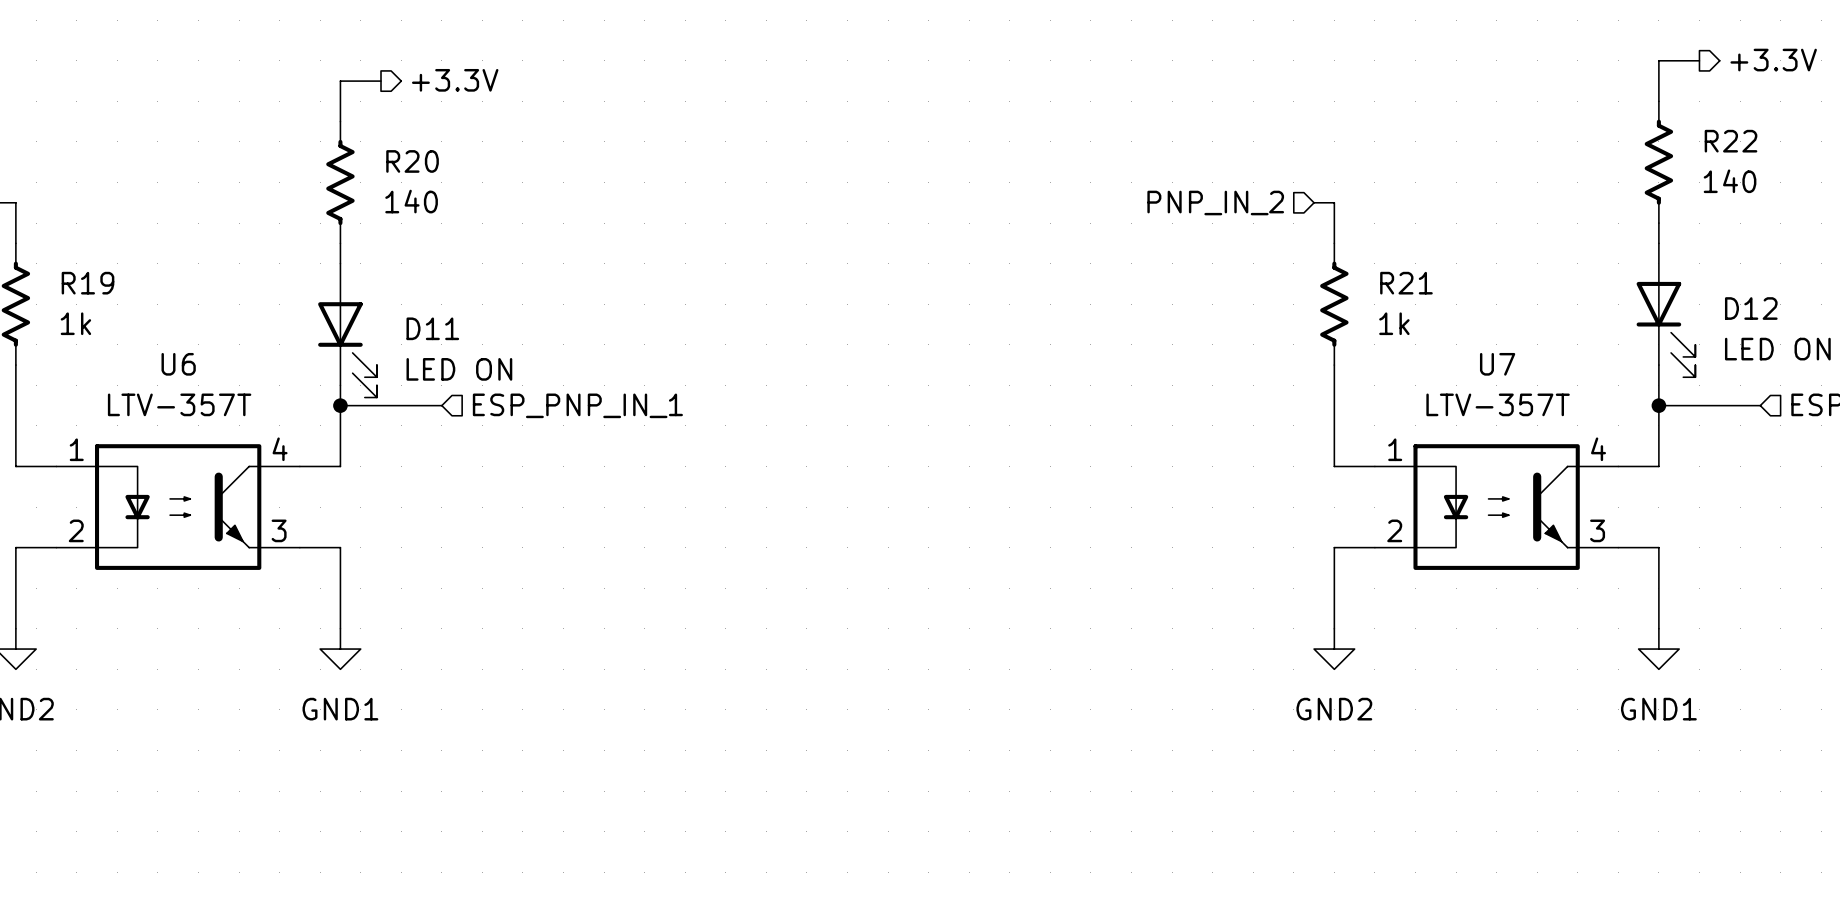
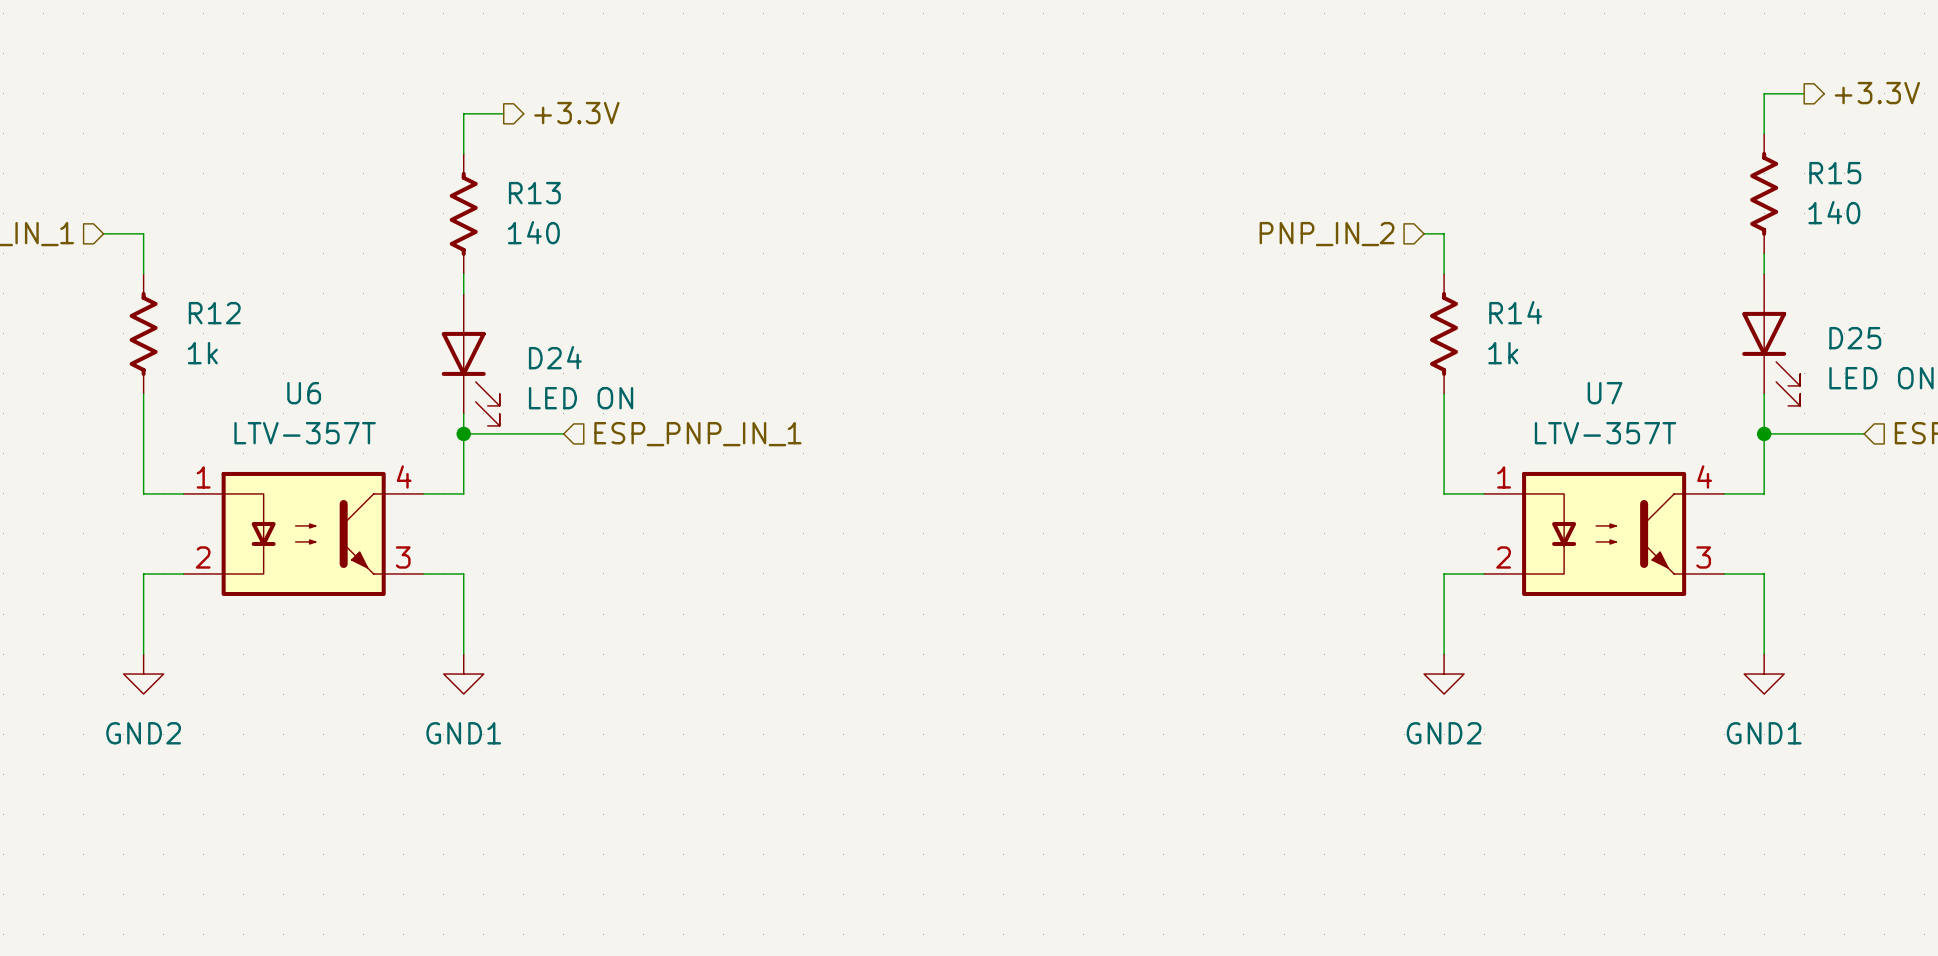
R22 name: R22 (1731, 141) -> R15 (1835, 173)
R20 name: R20 (412, 161) -> R13 (534, 193)
R19 name: R19 (88, 283) -> R12 (214, 313)
R21 name: R21 (1406, 283) -> R14 (1515, 312)
D12 name: D12 (1751, 308) -> D25 (1855, 338)
D11 name: D11 (432, 328) -> D24 (555, 357)

